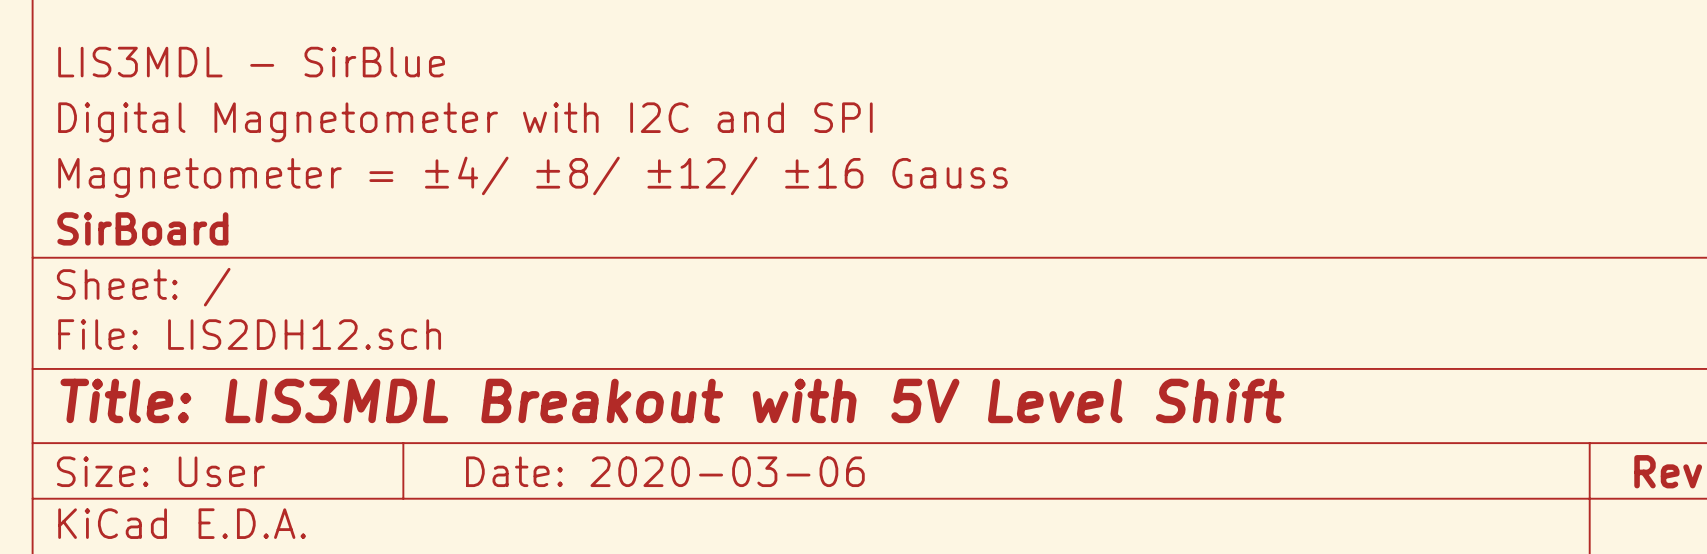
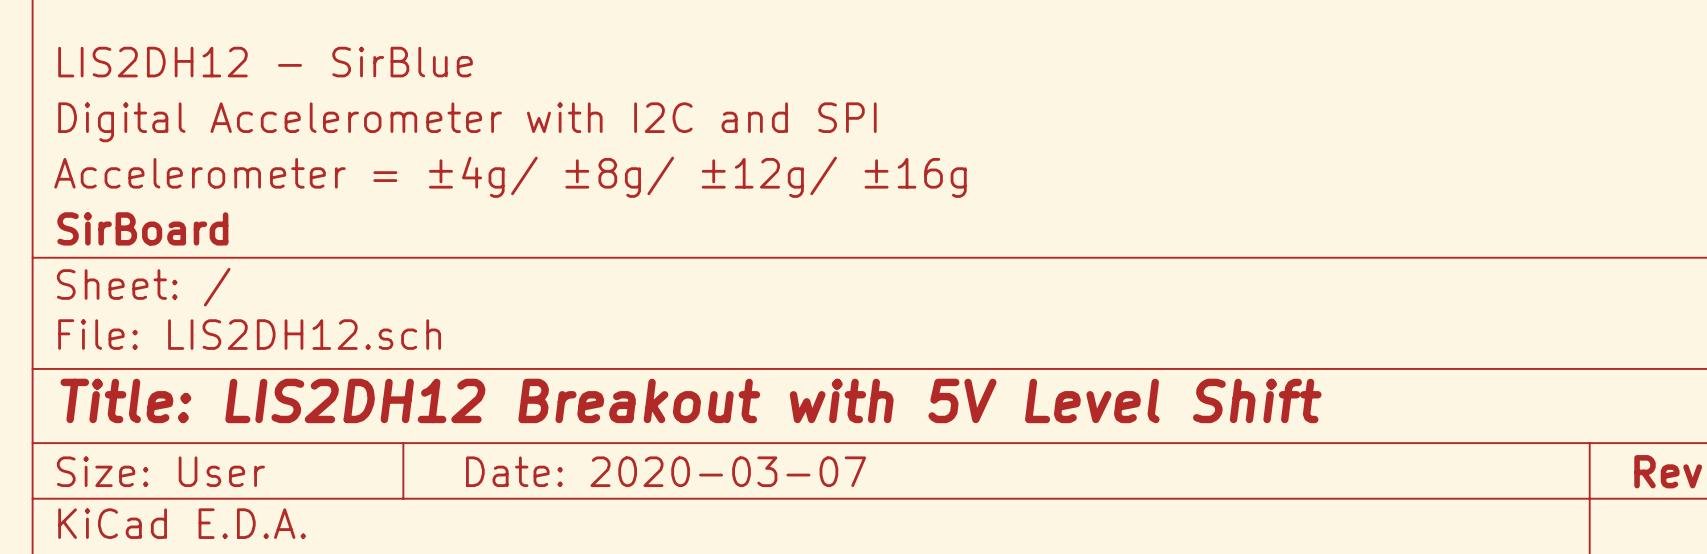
title block: LIS3MDL - SirBlue (251, 62) -> LIS2DH12 - SirBlue (265, 62)
title block: Digital Magnetometer with I2C and SPI (465, 122) -> Digital Accelerometer with I2C and SPI (467, 122)
title block: Magnetometer = ±4/ ±8/ ±12/ ±16 Gauss (532, 177) -> Accelerometer = ±4g/ ±8g/ ±12g/ ±16g (510, 177)
title block: Title: LIS3MDL Breakout with 5V Level Shift (672, 400) -> Title: LIS2DH12 Breakout with 5V Level Shift (691, 400)
title block: Date: 2020-03-06 (665, 471) -> Date: 2020-03-07 (666, 471)

